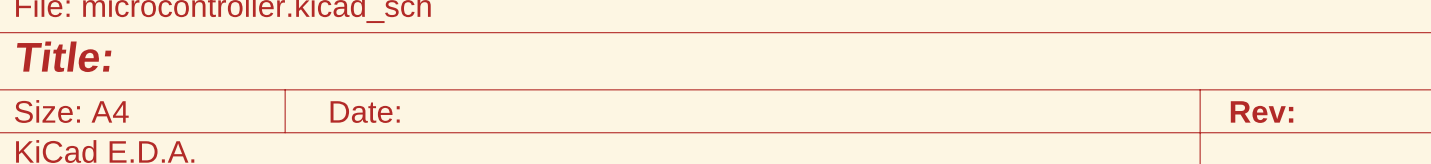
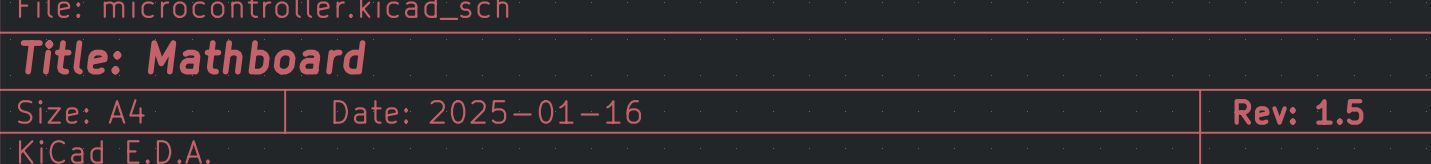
title block: Title: (64, 56) -> Title: Mathboard (193, 57)
title block: Date: (365, 112) -> Date: 2025-01-16 (487, 111)
title block: Rev: (1262, 112) -> Rev: 1.5 (1298, 111)

